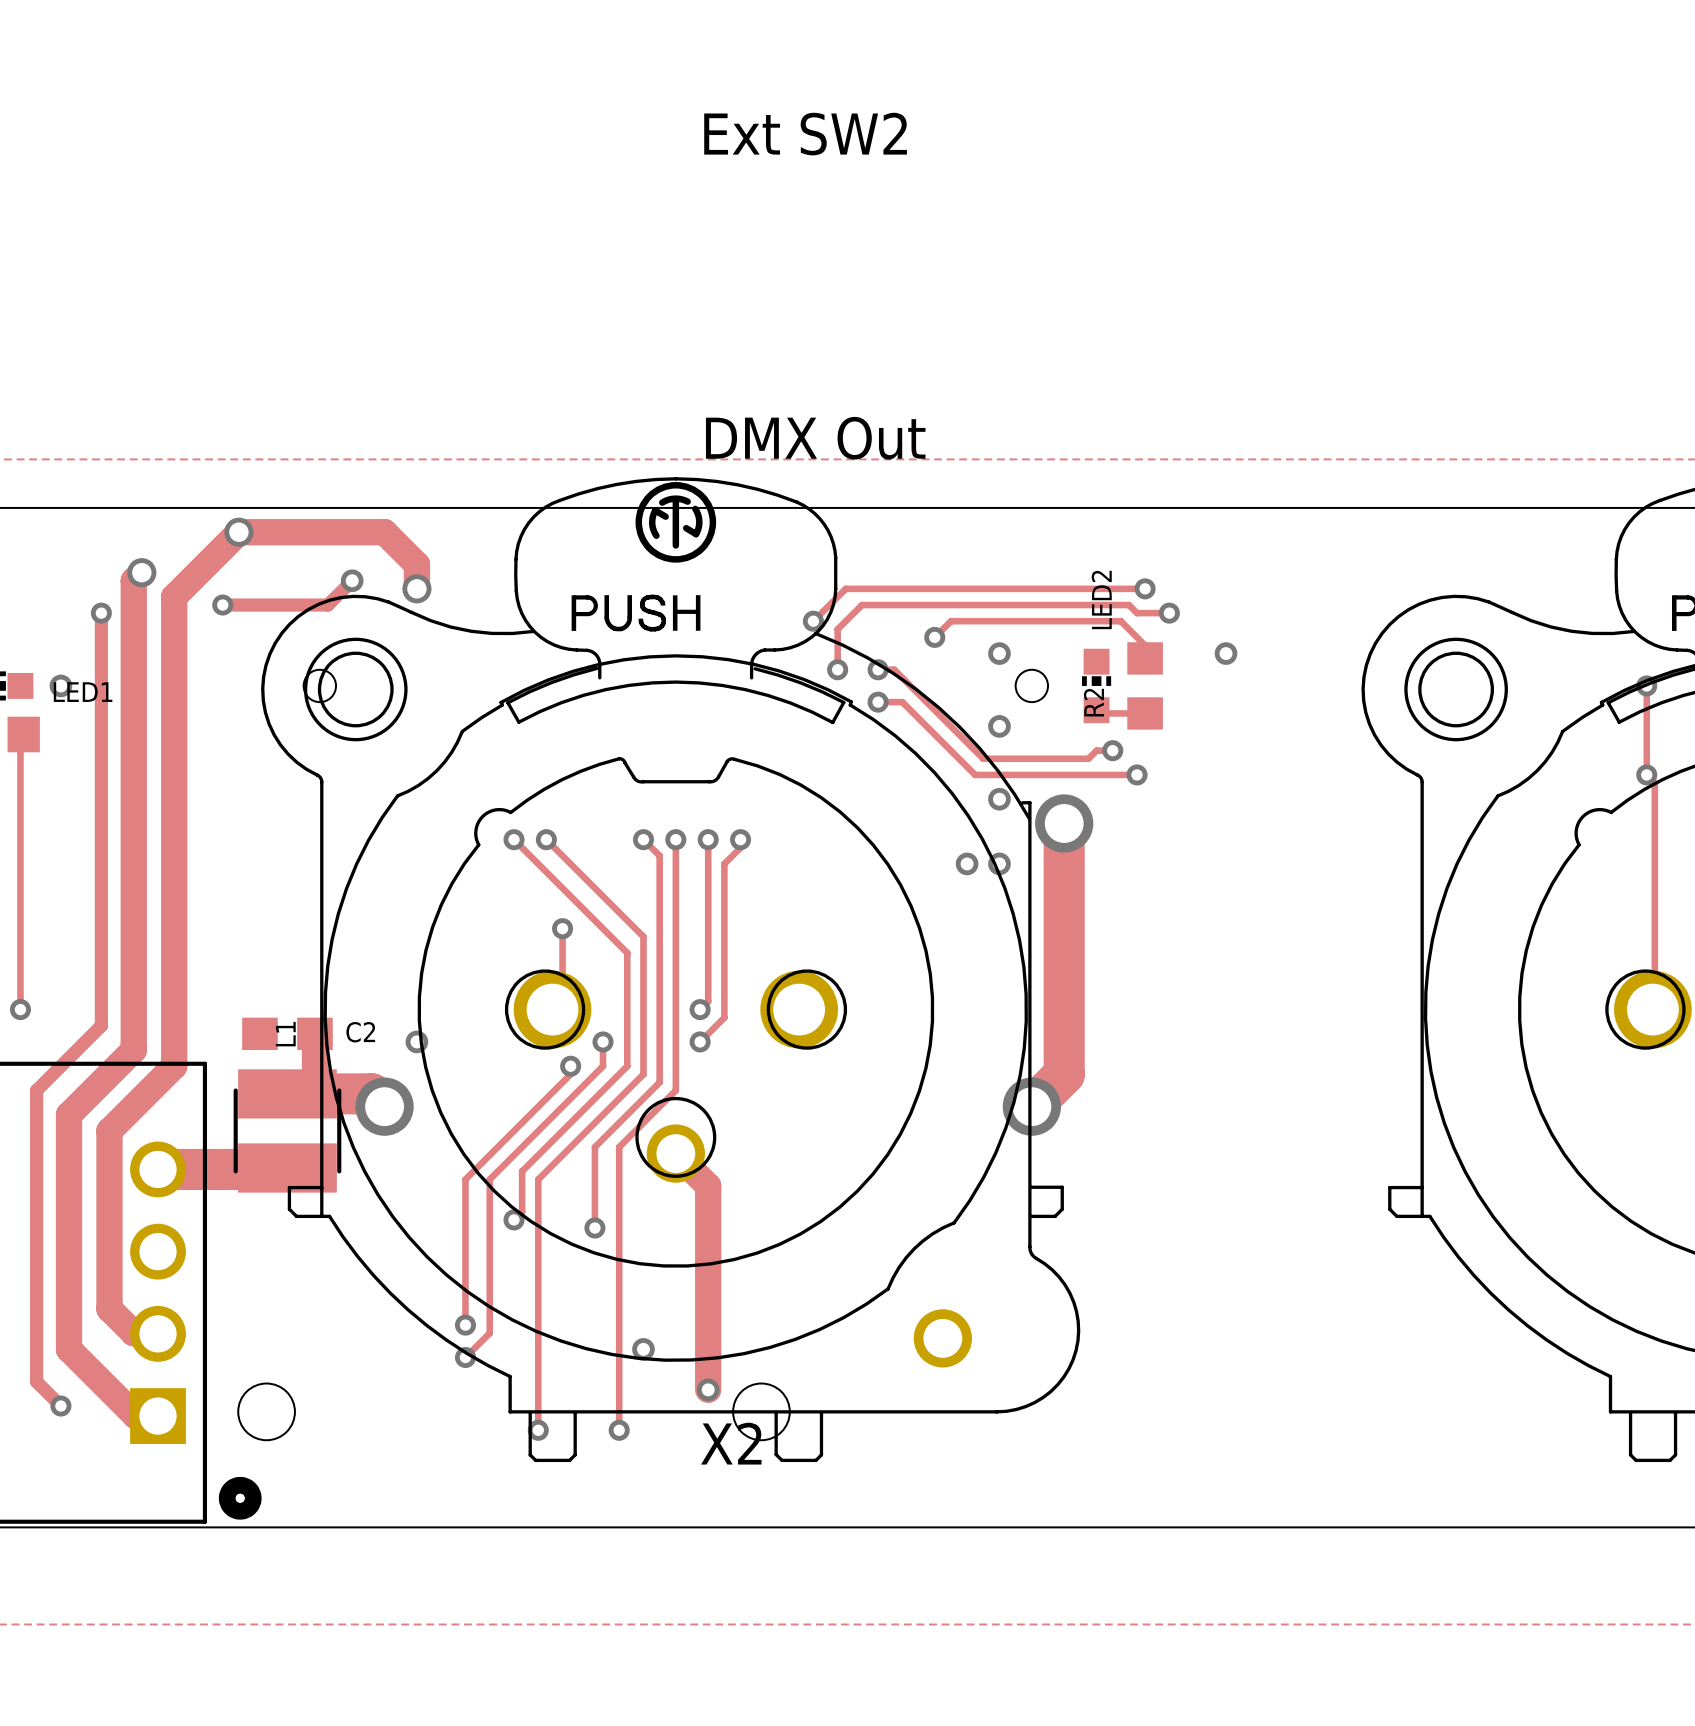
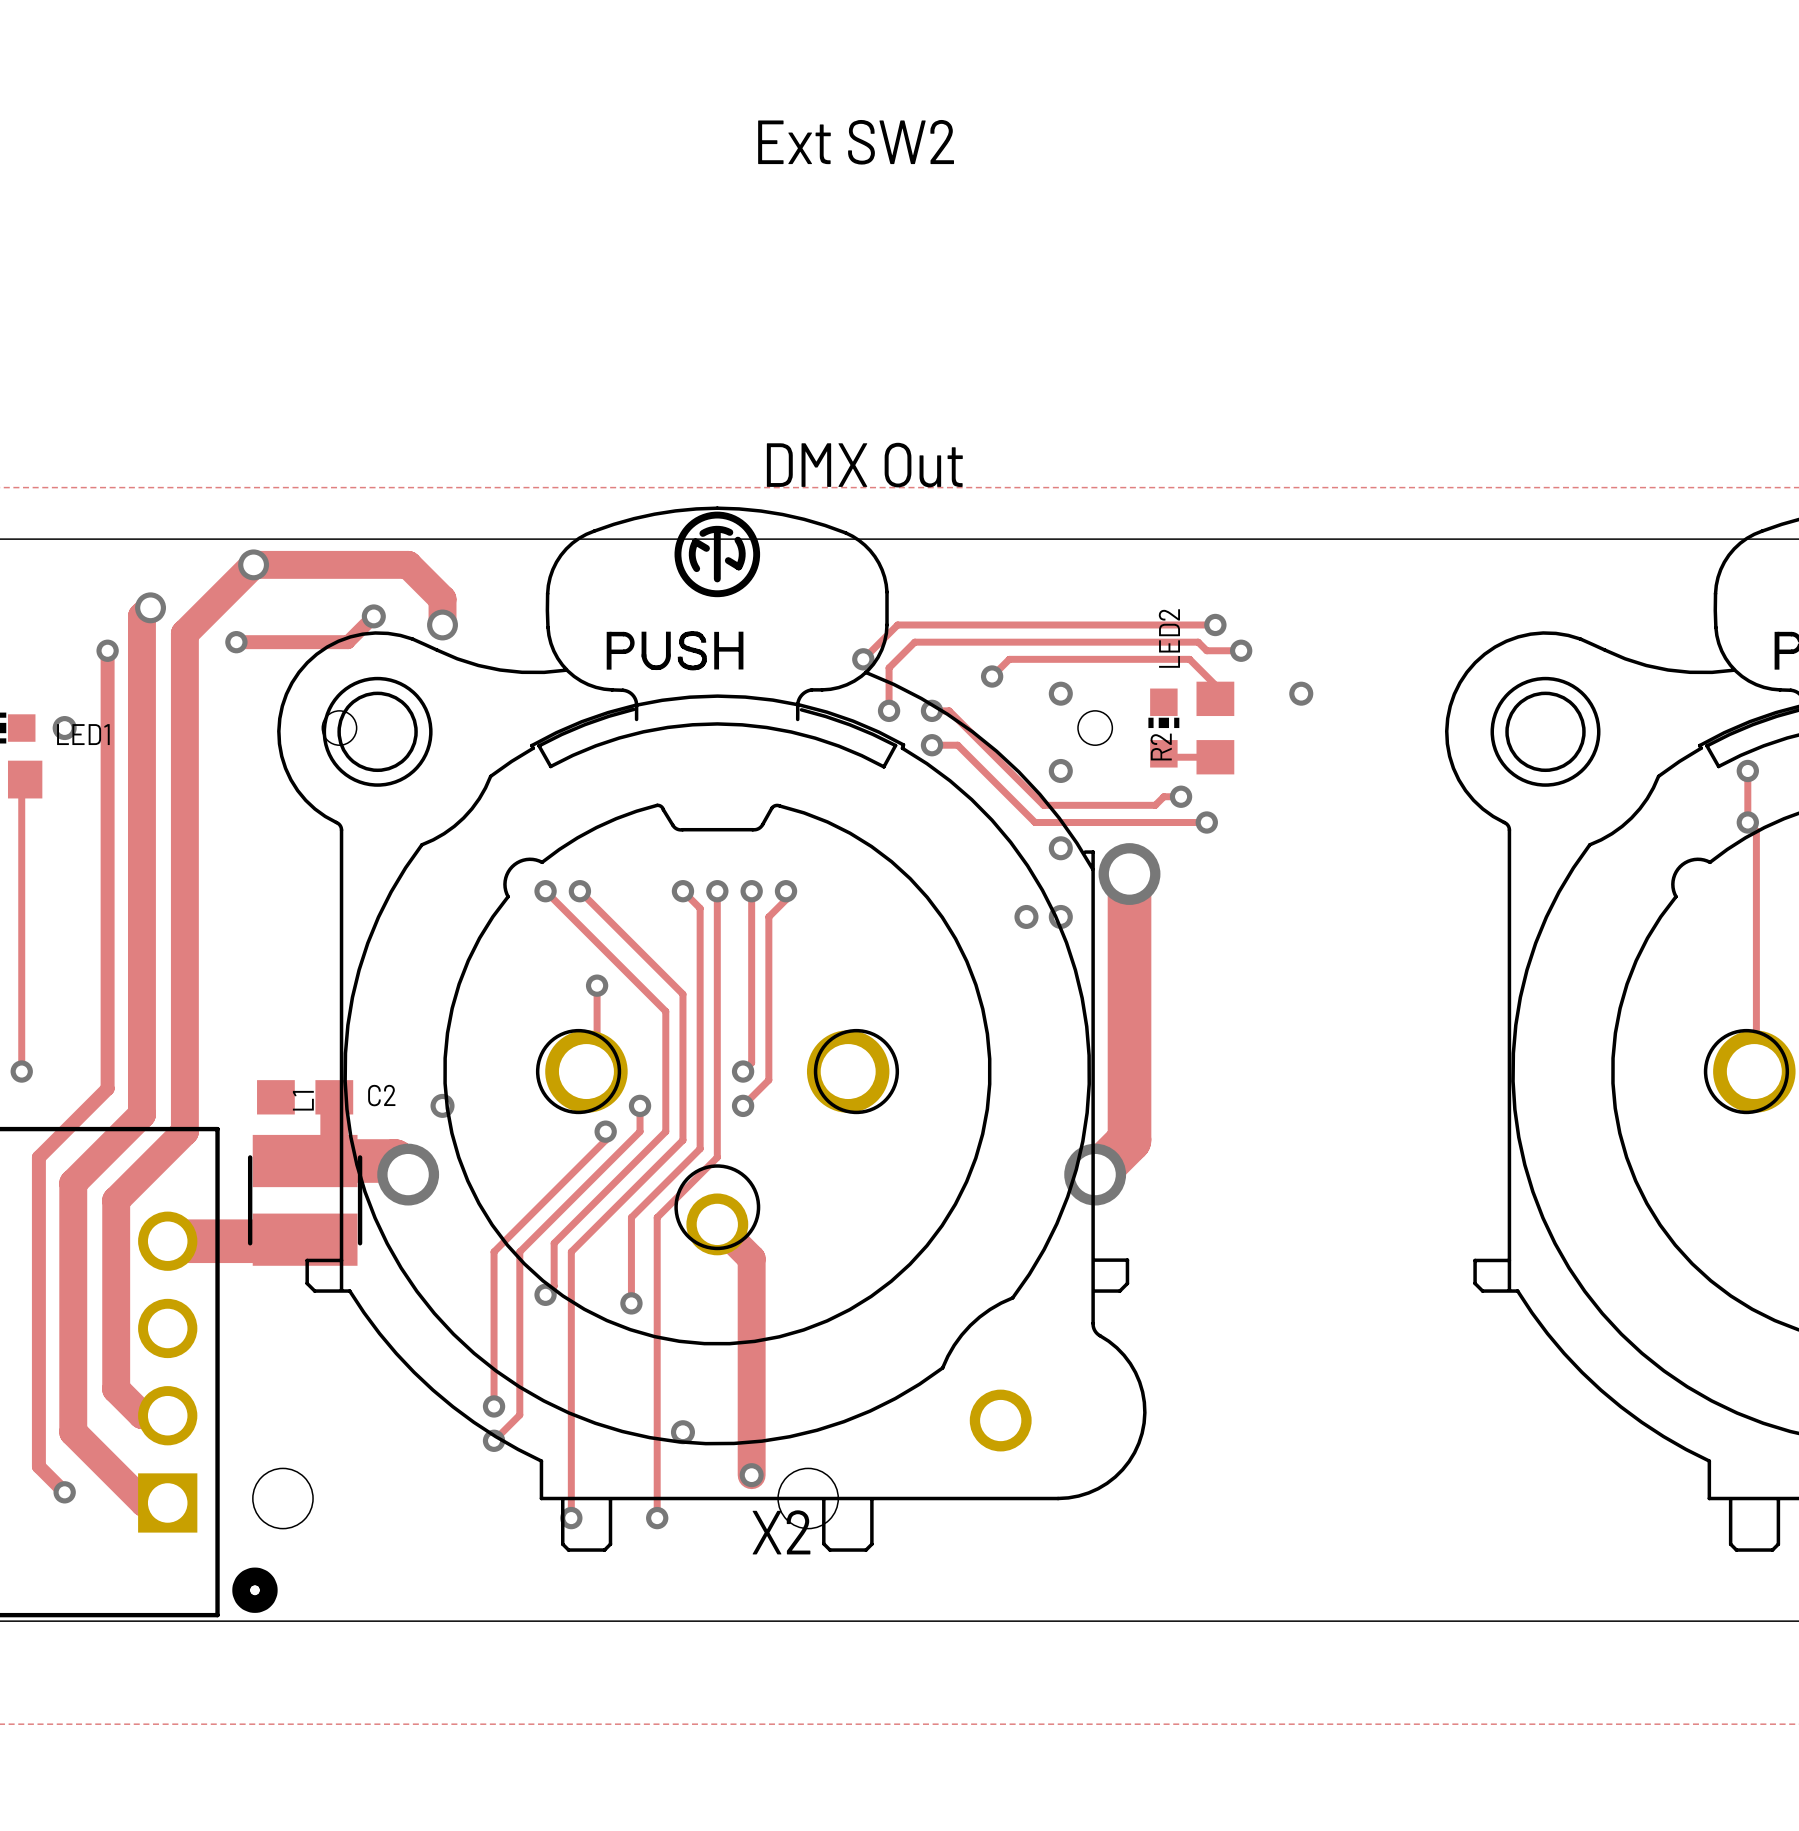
track: (1646, 685) (1646, 726) -> none
via position: (1646, 685) -> (1747, 770)

